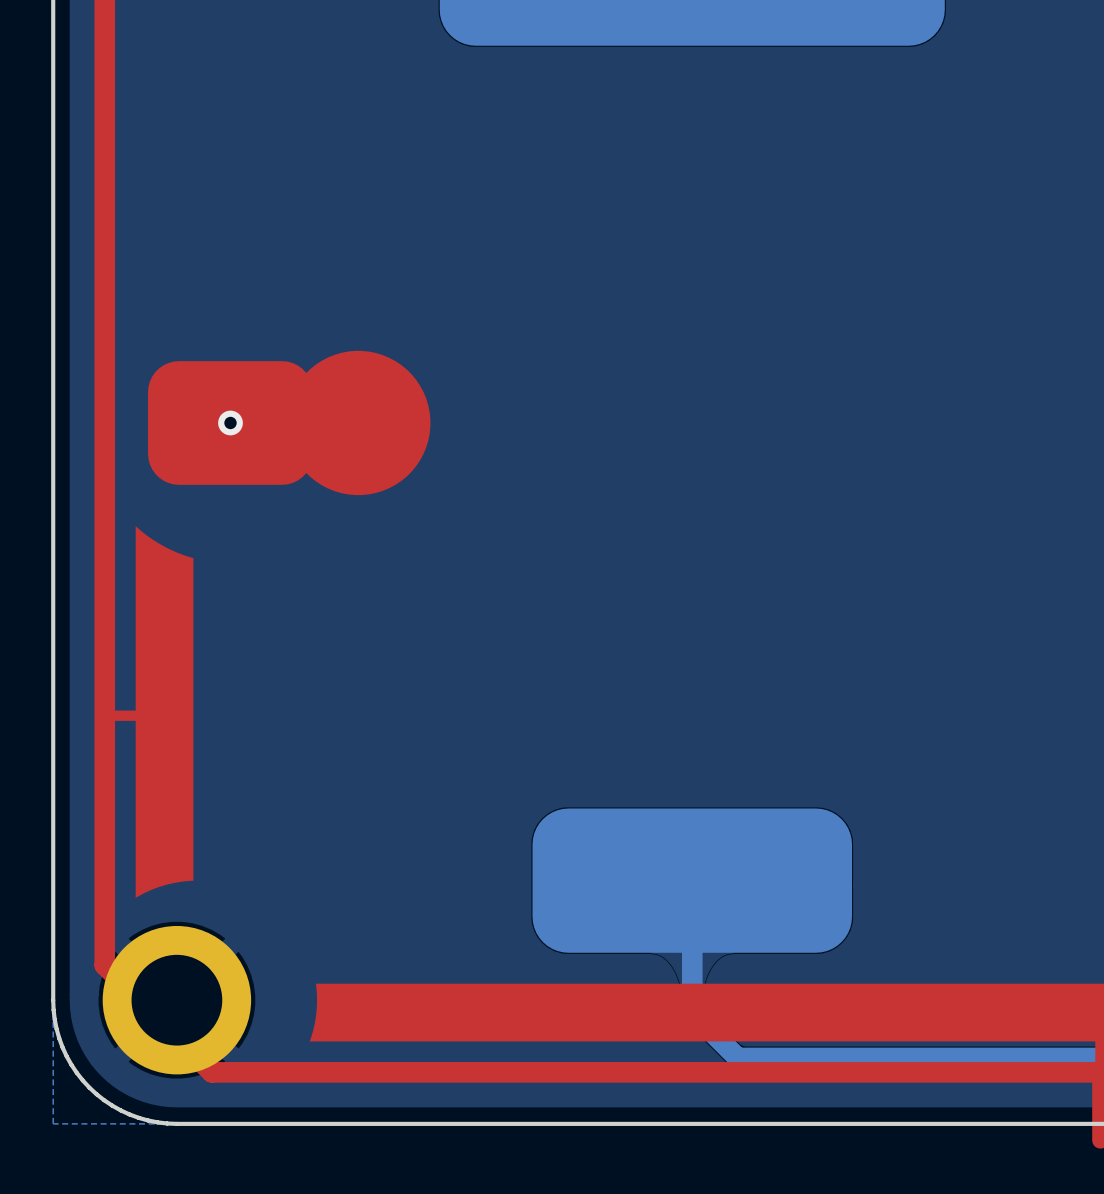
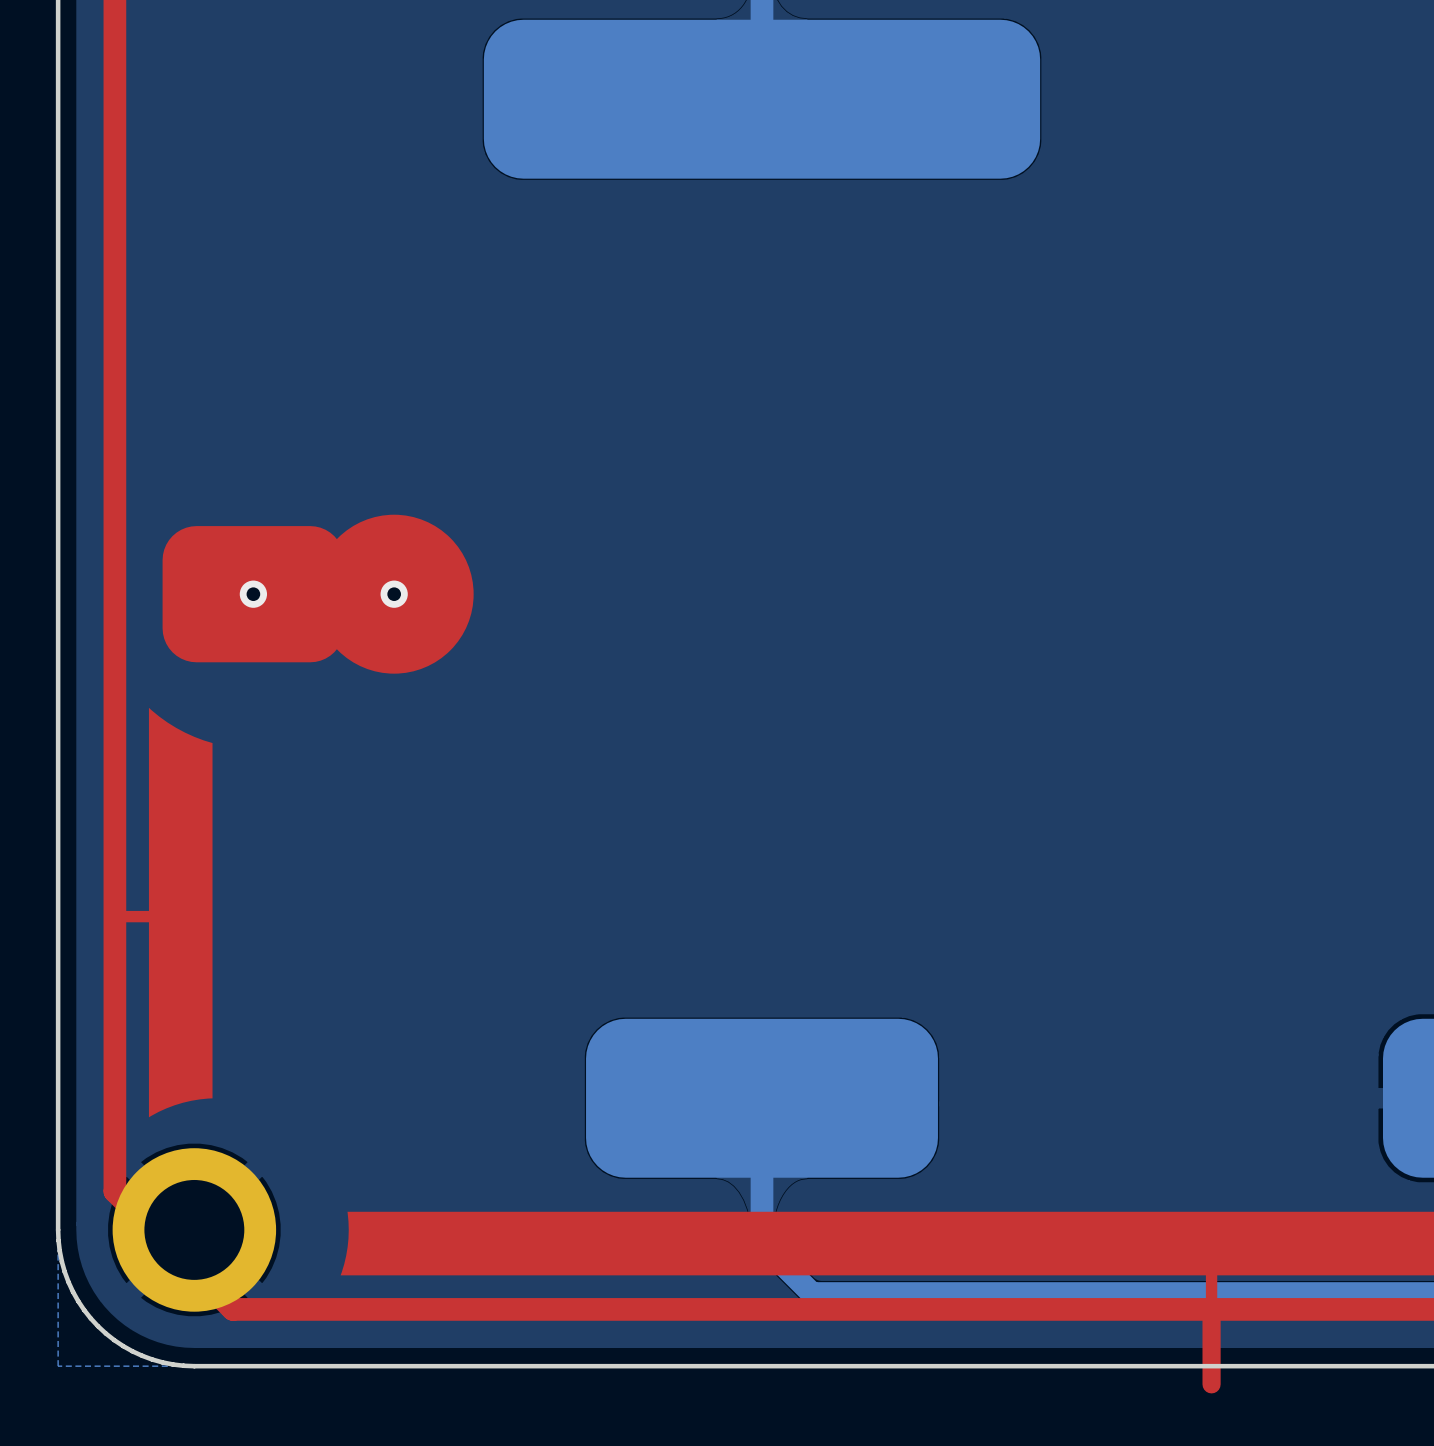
via: none -> (394, 594)

